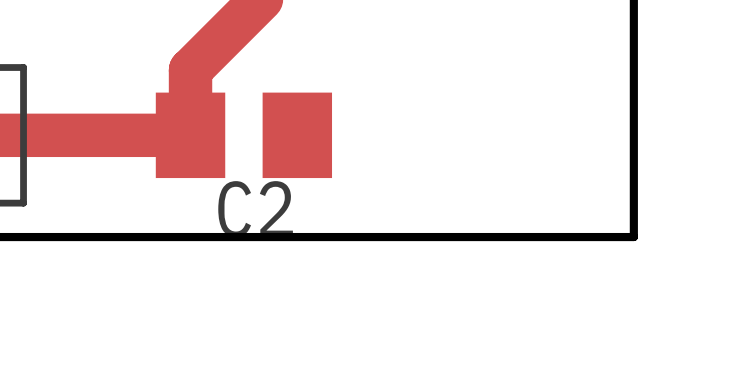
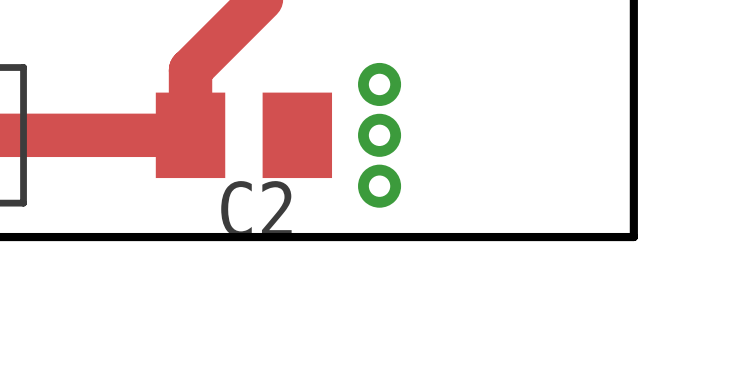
via: none -> (379, 84)
via: none -> (379, 135)
via: none -> (379, 186)

